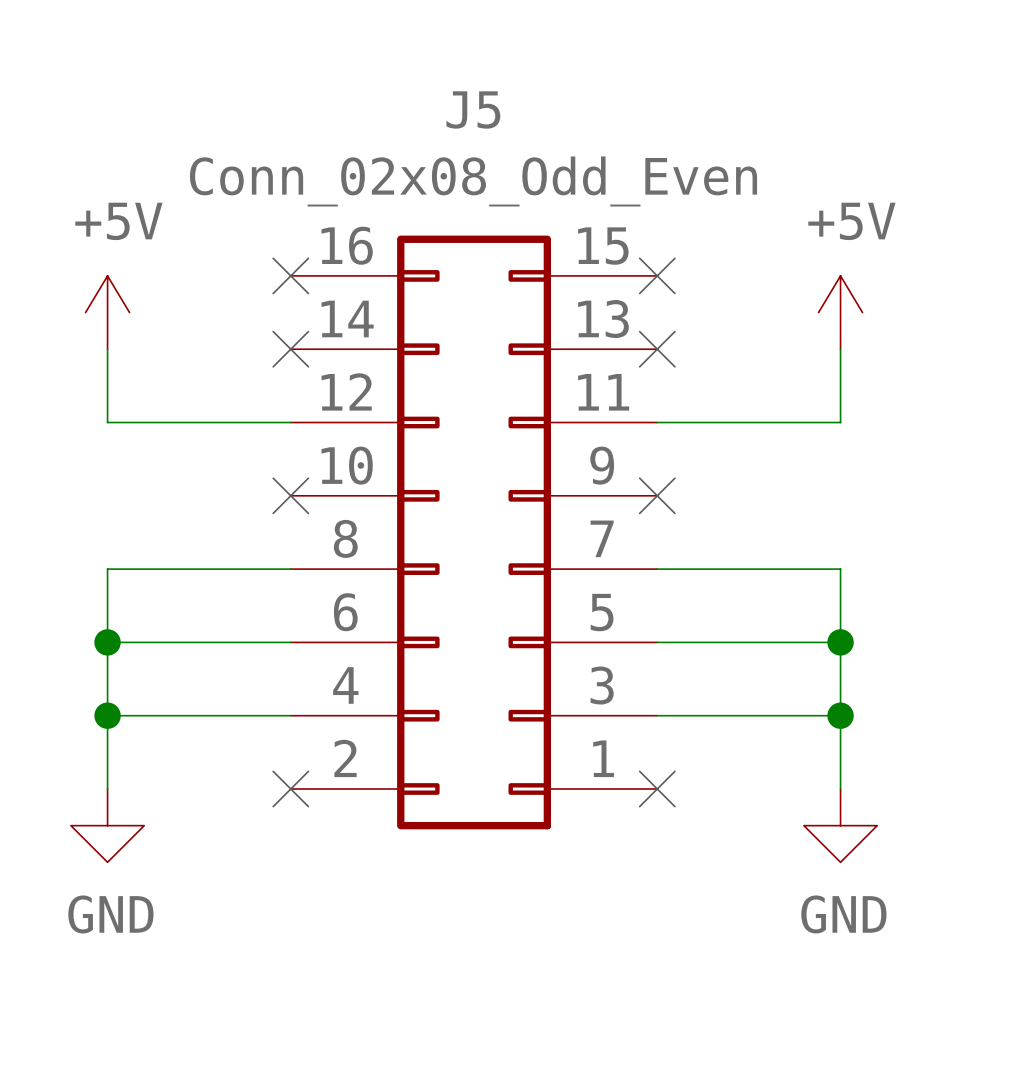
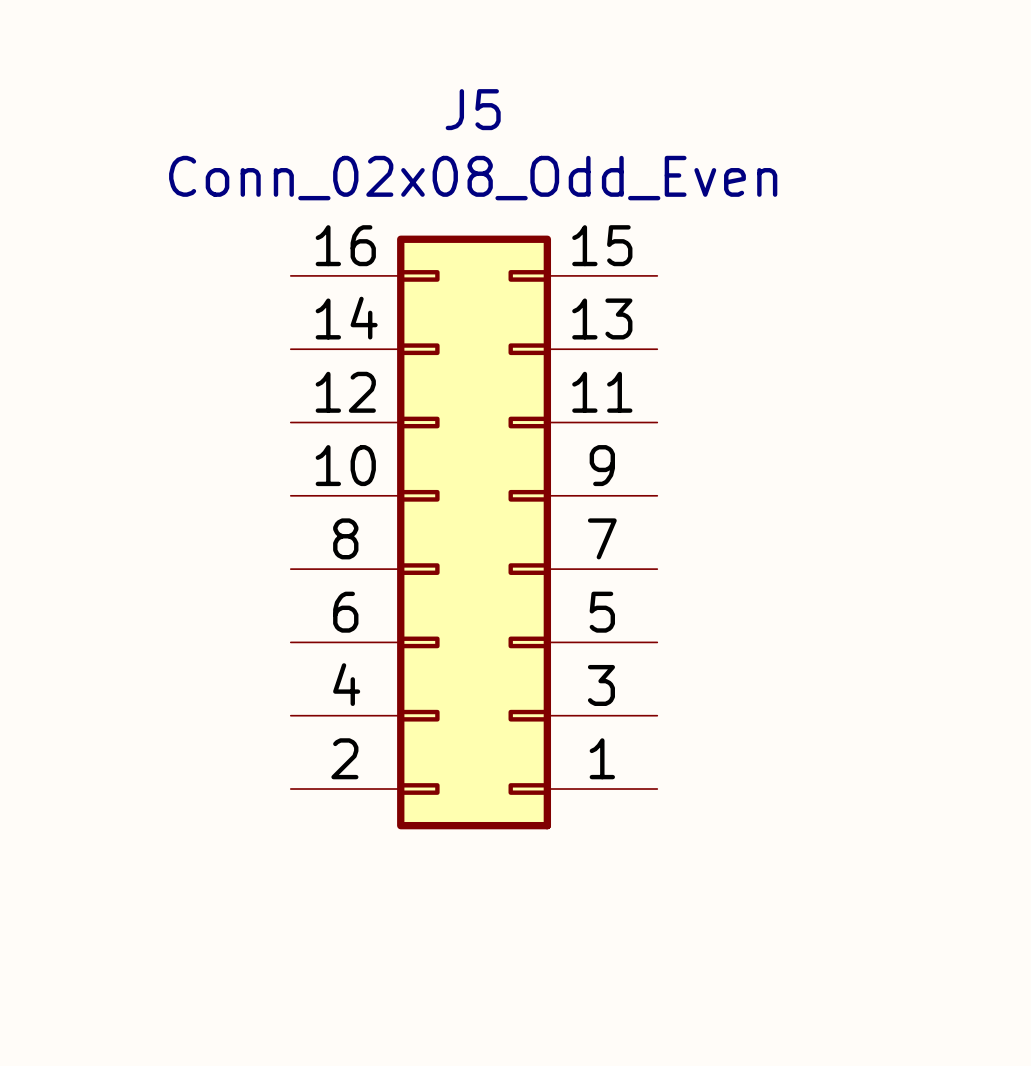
no-connect mark: (290, 275) -> none
no-connect mark: (657, 275) -> none
power symbol: +5V (107, 312) -> none
power symbol: +5V (840, 312) -> none
wire: (107, 349) (107, 422) (290, 422) -> none
no-connect mark: (290, 349) -> none
no-connect mark: (657, 349) -> none
wire: (840, 349) (840, 422) (657, 422) -> none
no-connect mark: (290, 495) -> none
no-connect mark: (657, 495) -> none
wire: (290, 569) (107, 569) (107, 789) -> none
wire: (657, 569) (840, 569) (840, 789) -> none
wire: (107, 642) (290, 642) -> none
junction: (107, 642) -> none
wire: (657, 642) (840, 642) -> none
junction: (840, 642) -> none
wire: (107, 715) (290, 715) -> none
junction: (107, 715) -> none
wire: (657, 715) (840, 715) -> none
junction: (840, 715) -> none
no-connect mark: (290, 789) -> none
no-connect mark: (657, 789) -> none
power symbol: GND (107, 825) -> none
power symbol: GND (840, 825) -> none

